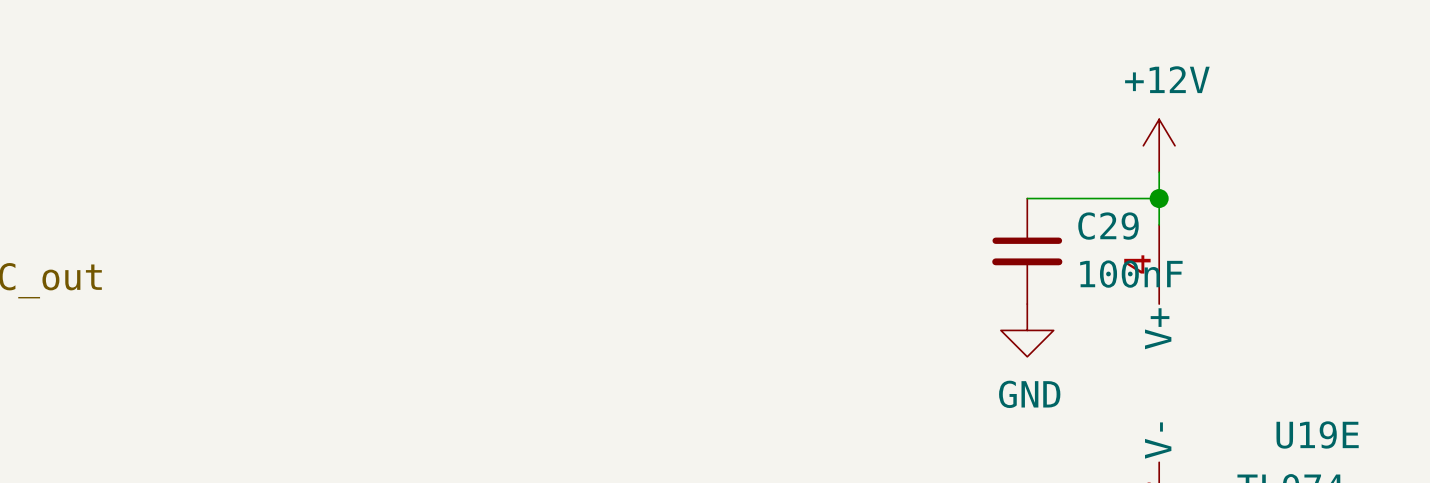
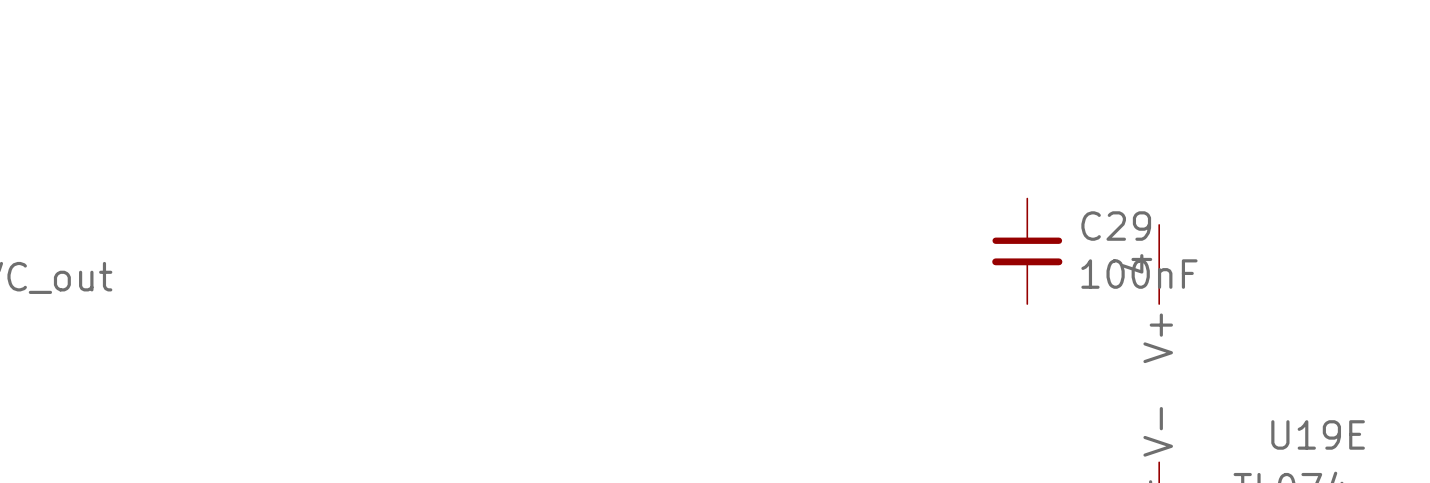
power symbol: +12V (1159, 145) -> none
wire: (1159, 172) (1159, 224) -> none
wire: (1027, 198) (1159, 198) -> none
junction: (1159, 198) -> none
power symbol: GND (1027, 330) -> none

